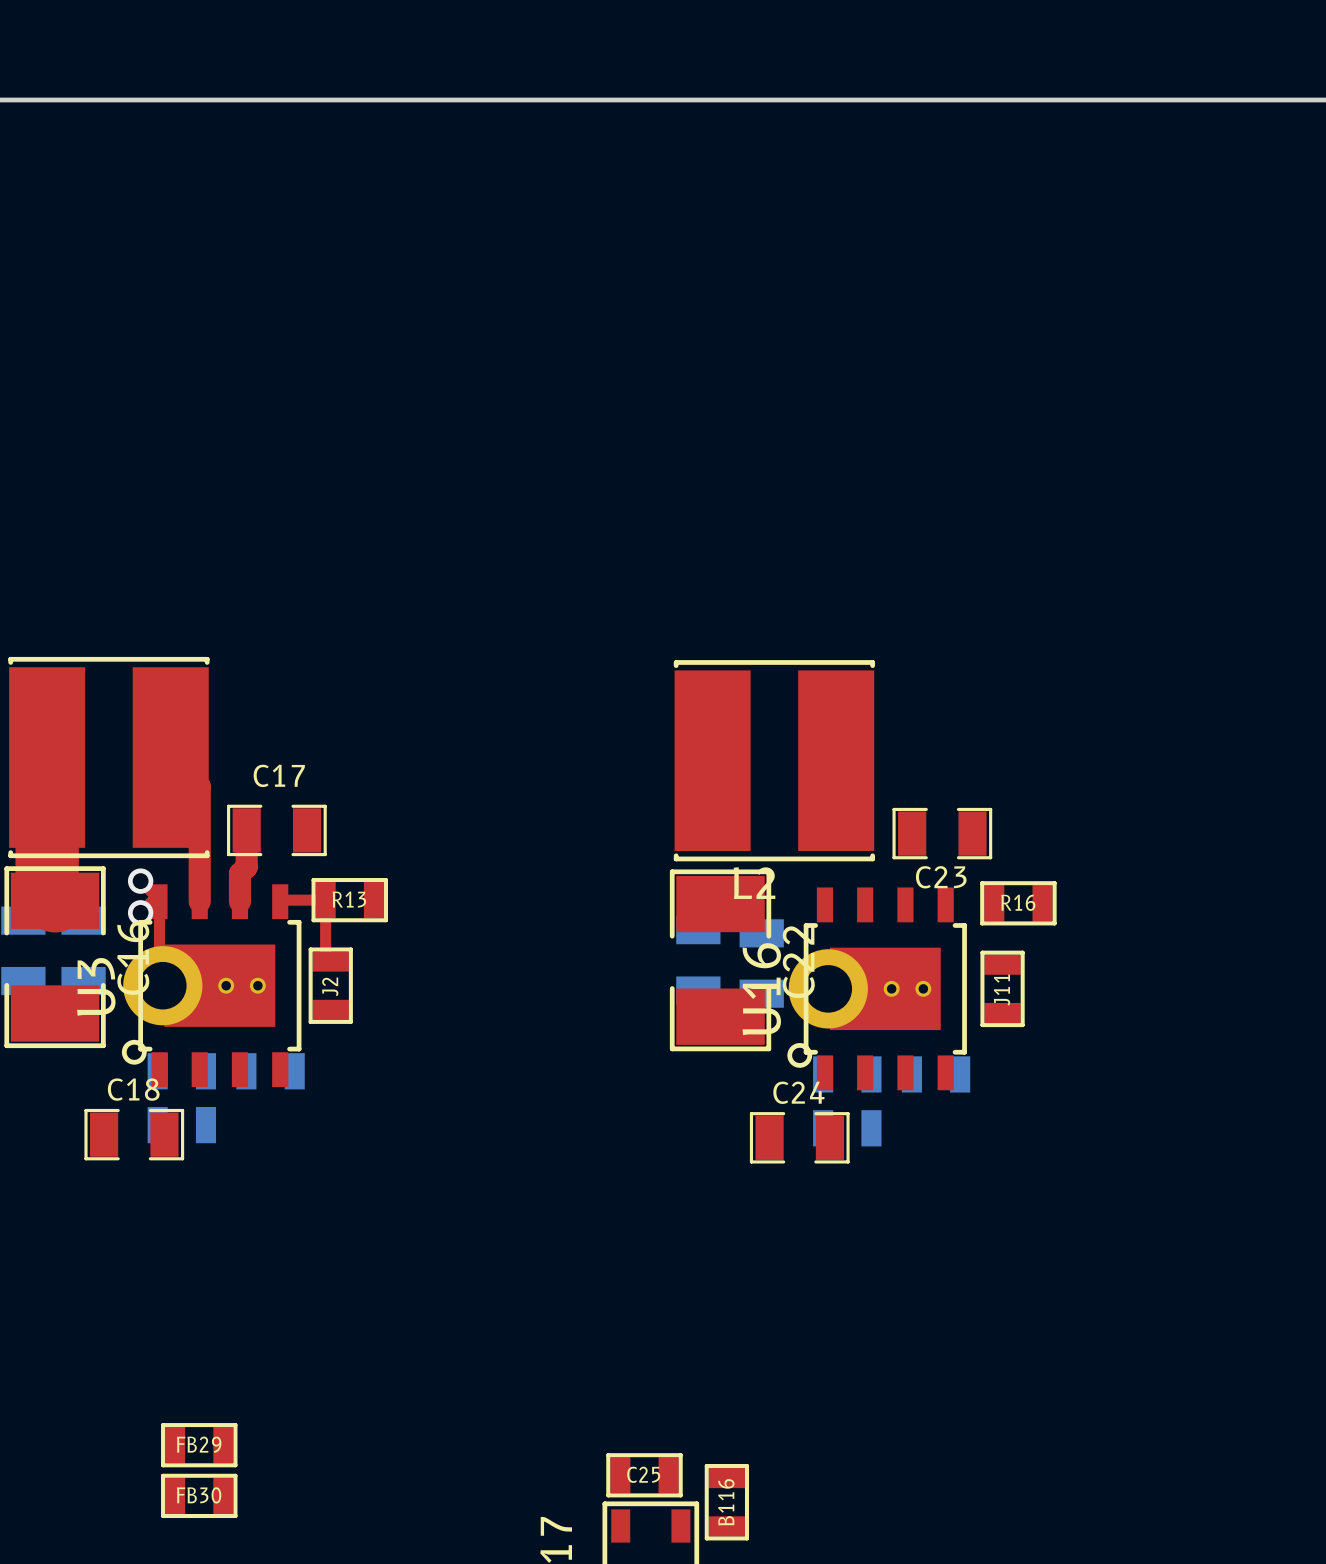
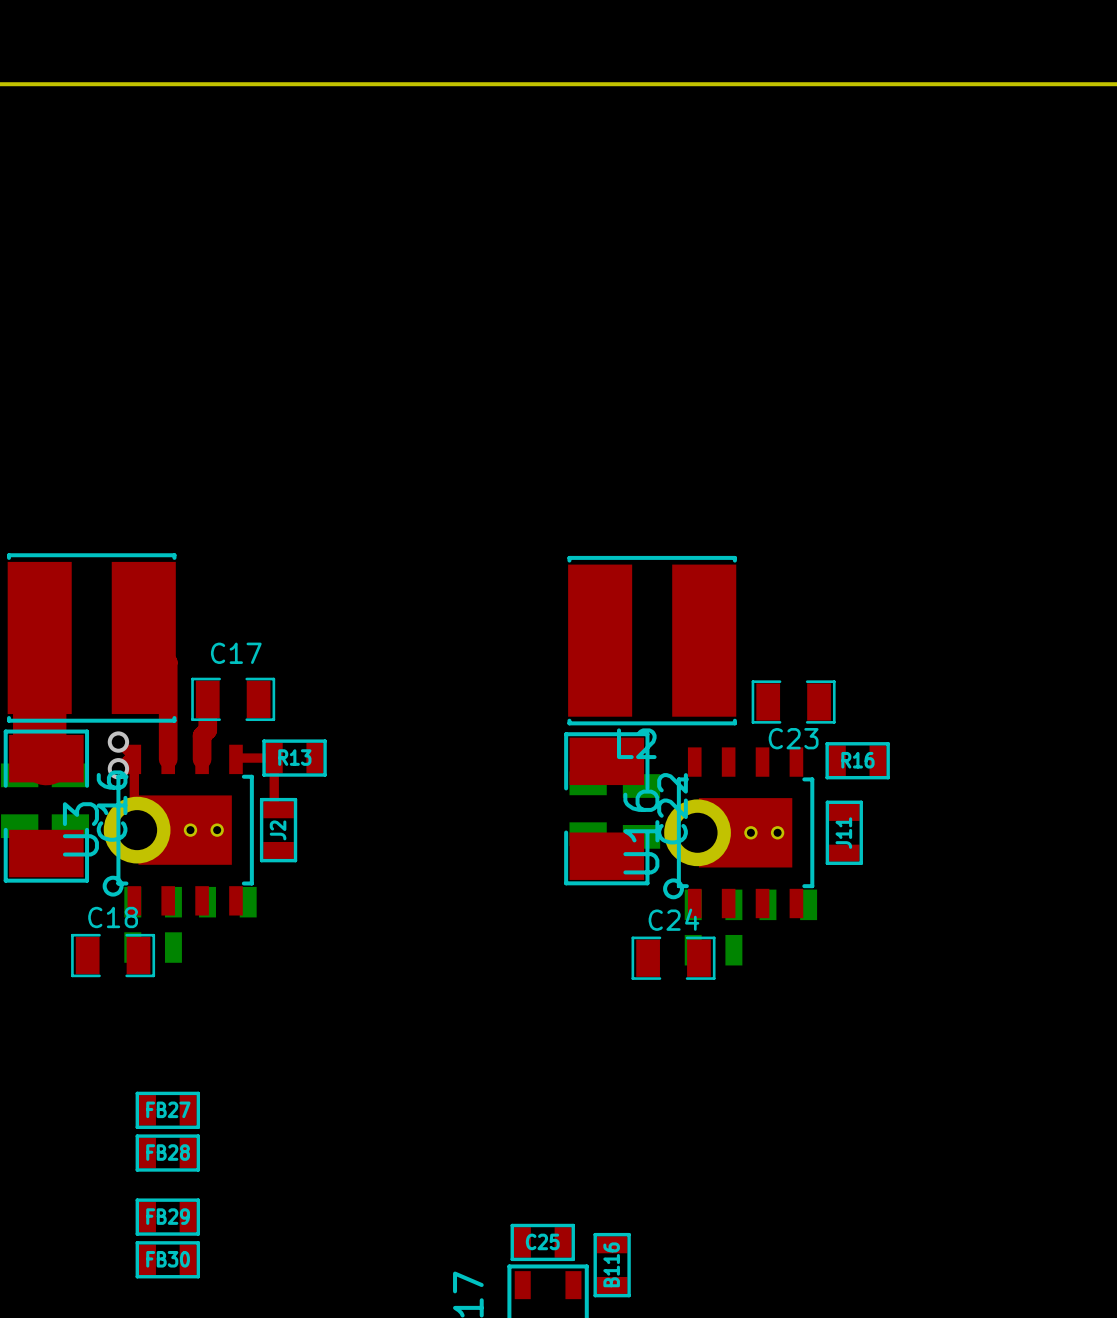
FB27: none -> (167, 1110)
FB28: none -> (167, 1153)

